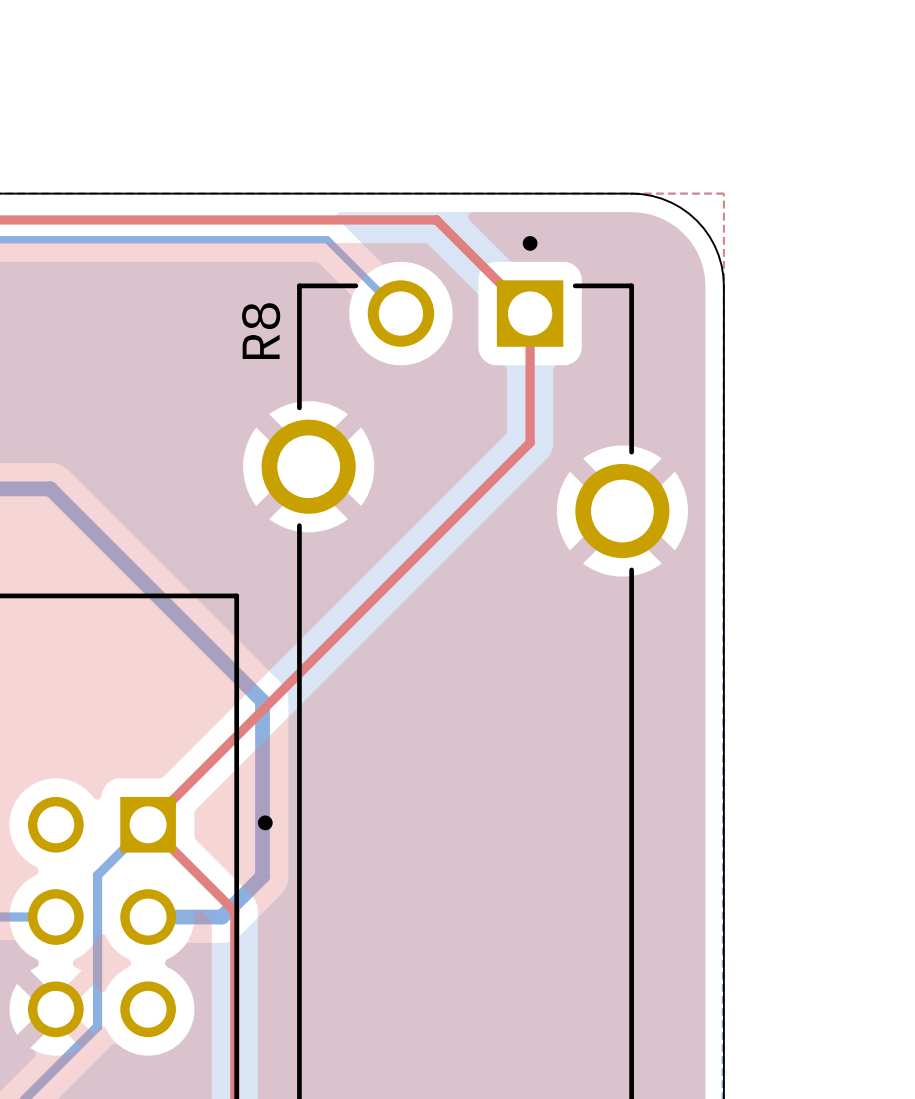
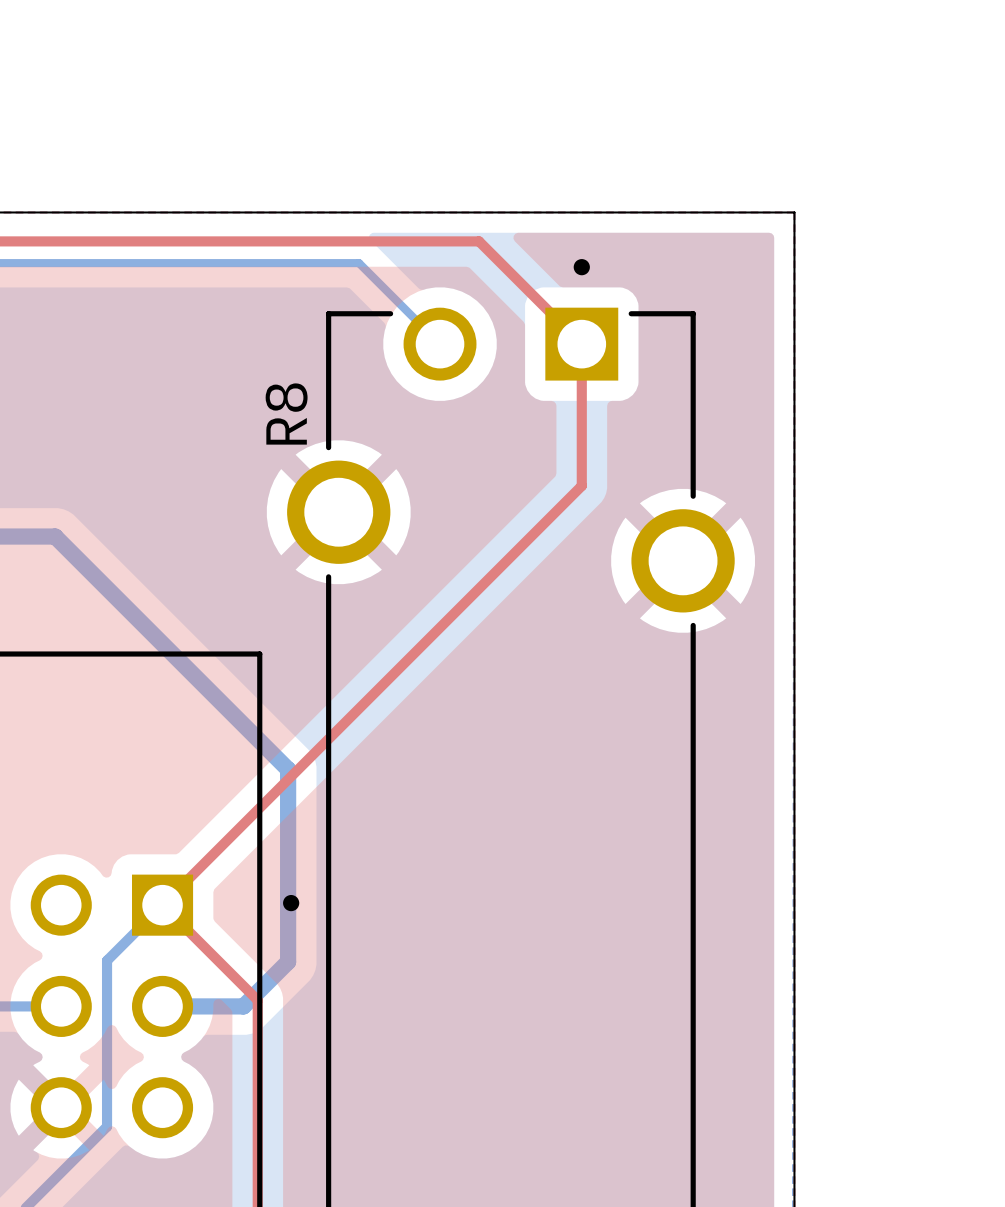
board edge: (631, 193) (652, 195) (671, 202) (696, 220) (709, 236) (718, 255) (723, 285) -> (693, 212) (794, 212) (794, 313)
R8 name position: R8 (261, 331) -> R8 (286, 414)

